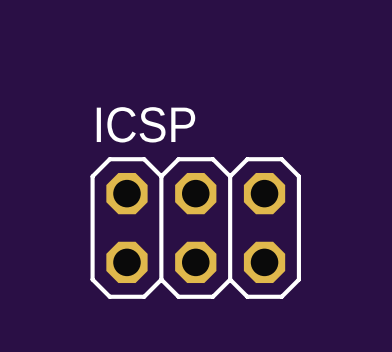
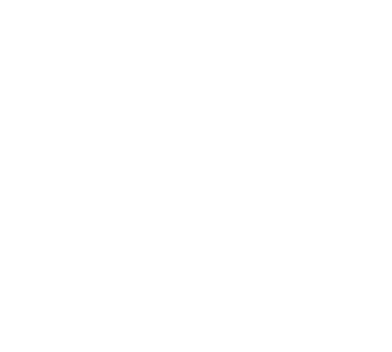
ICSP: (195, 228) -> none

